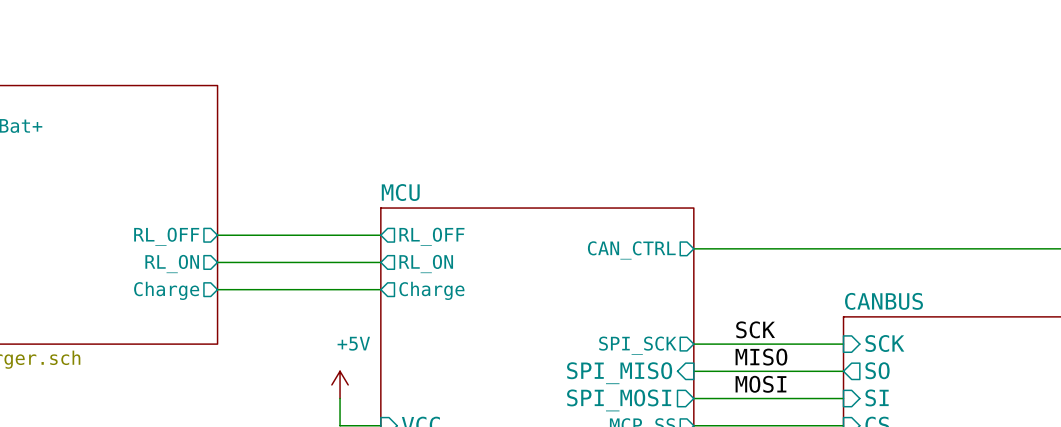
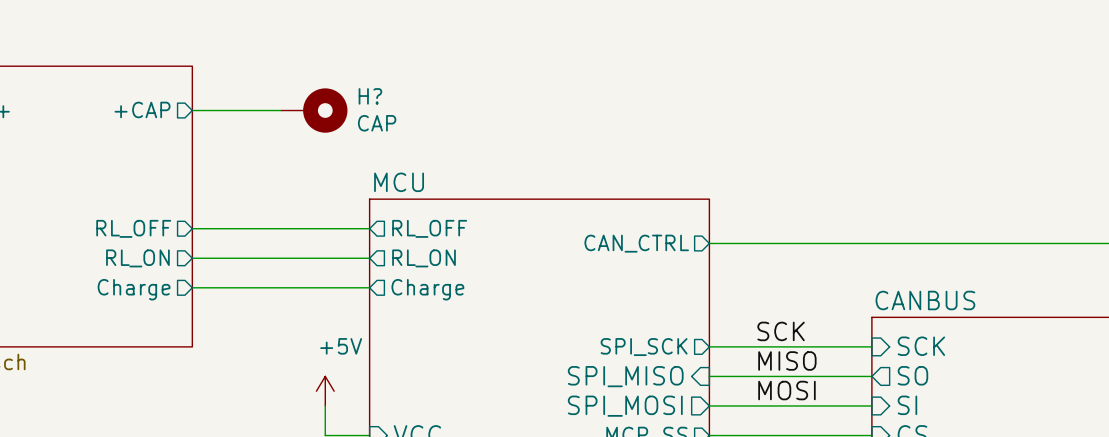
sheet pin: none -> +CAP (142, 109)
wire: none -> (192, 110) (280, 110)
H?: none -> CAP (314, 110)

